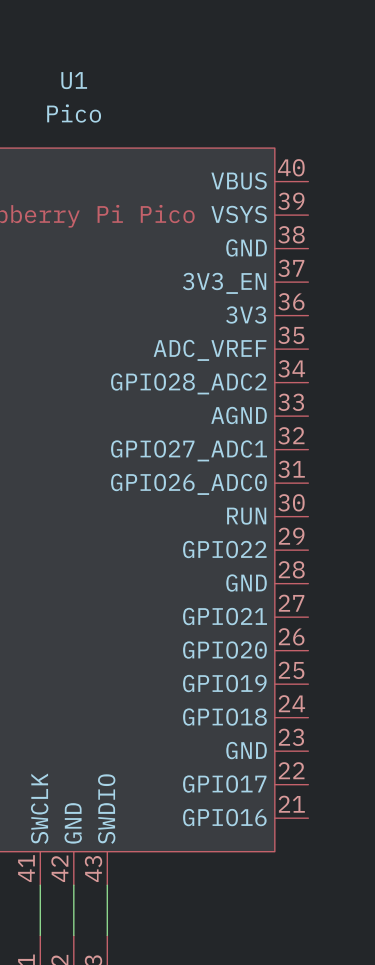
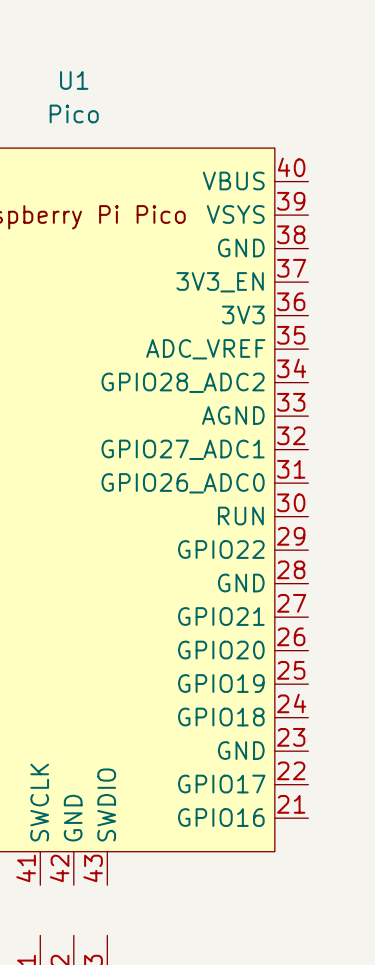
wire: (40, 885) (40, 935) -> none
wire: (73, 885) (73, 935) -> none
wire: (107, 885) (107, 935) -> none

